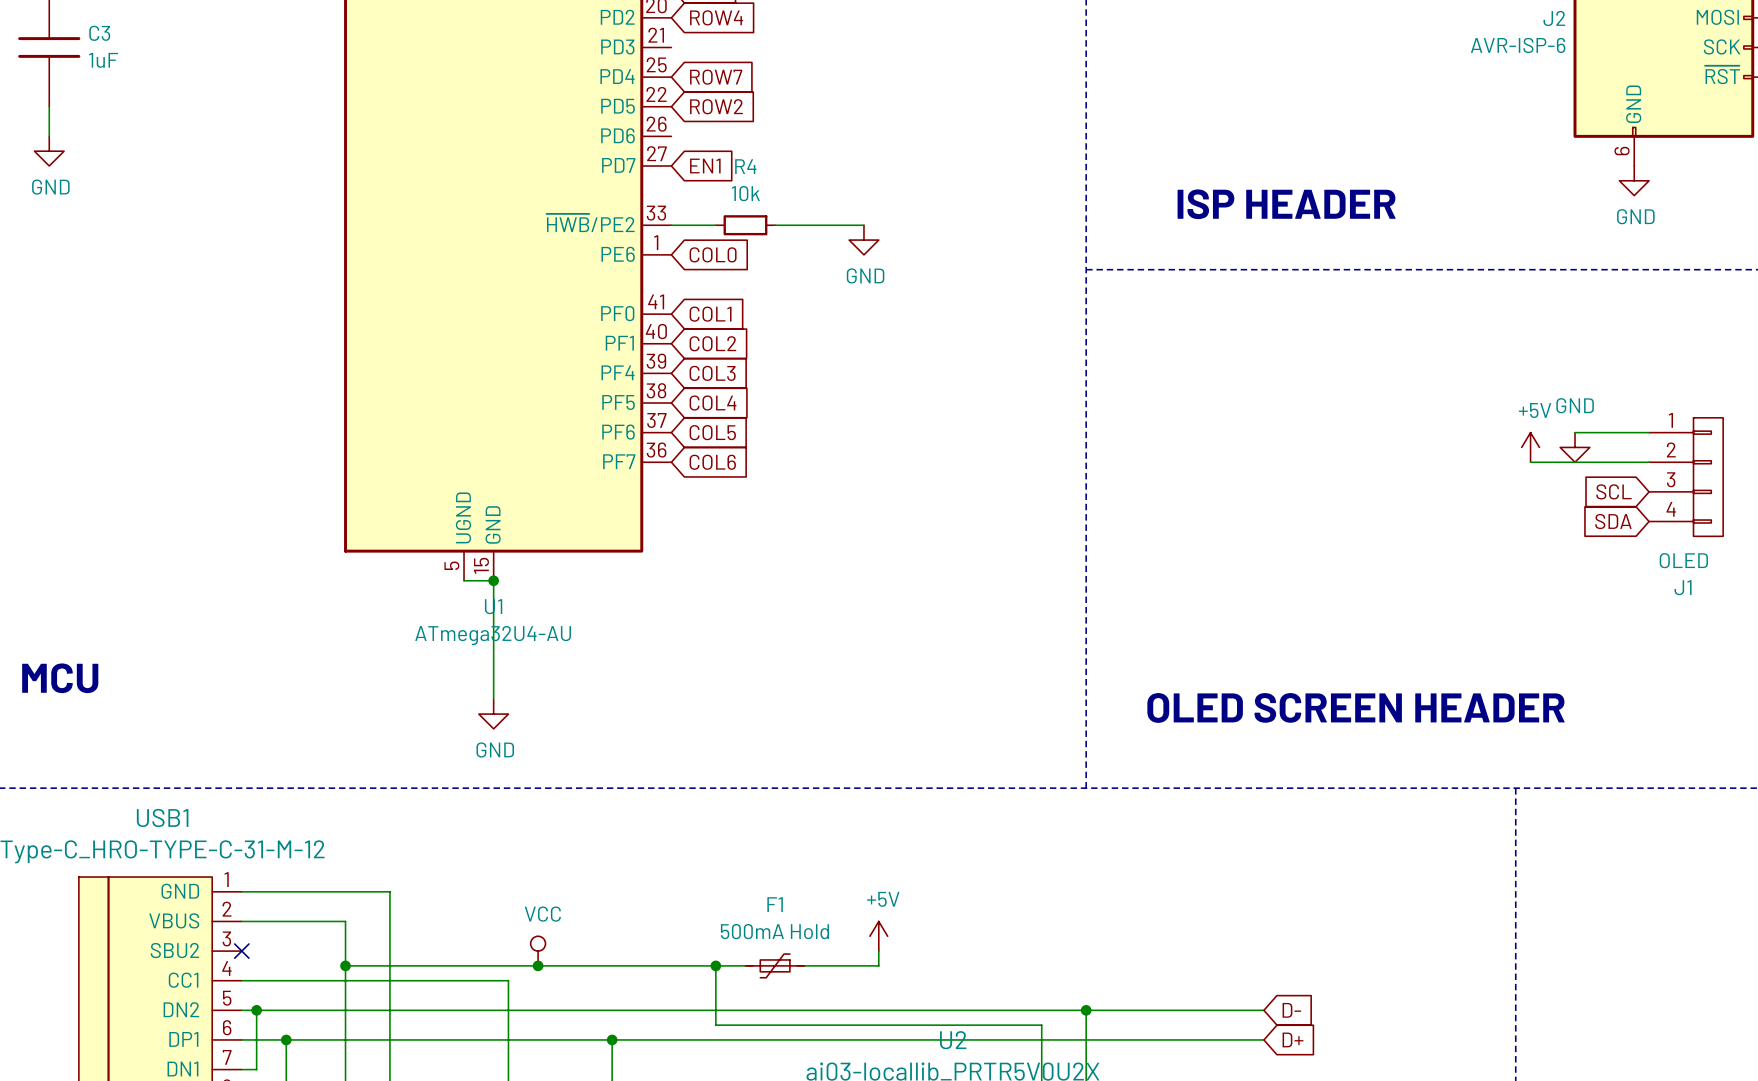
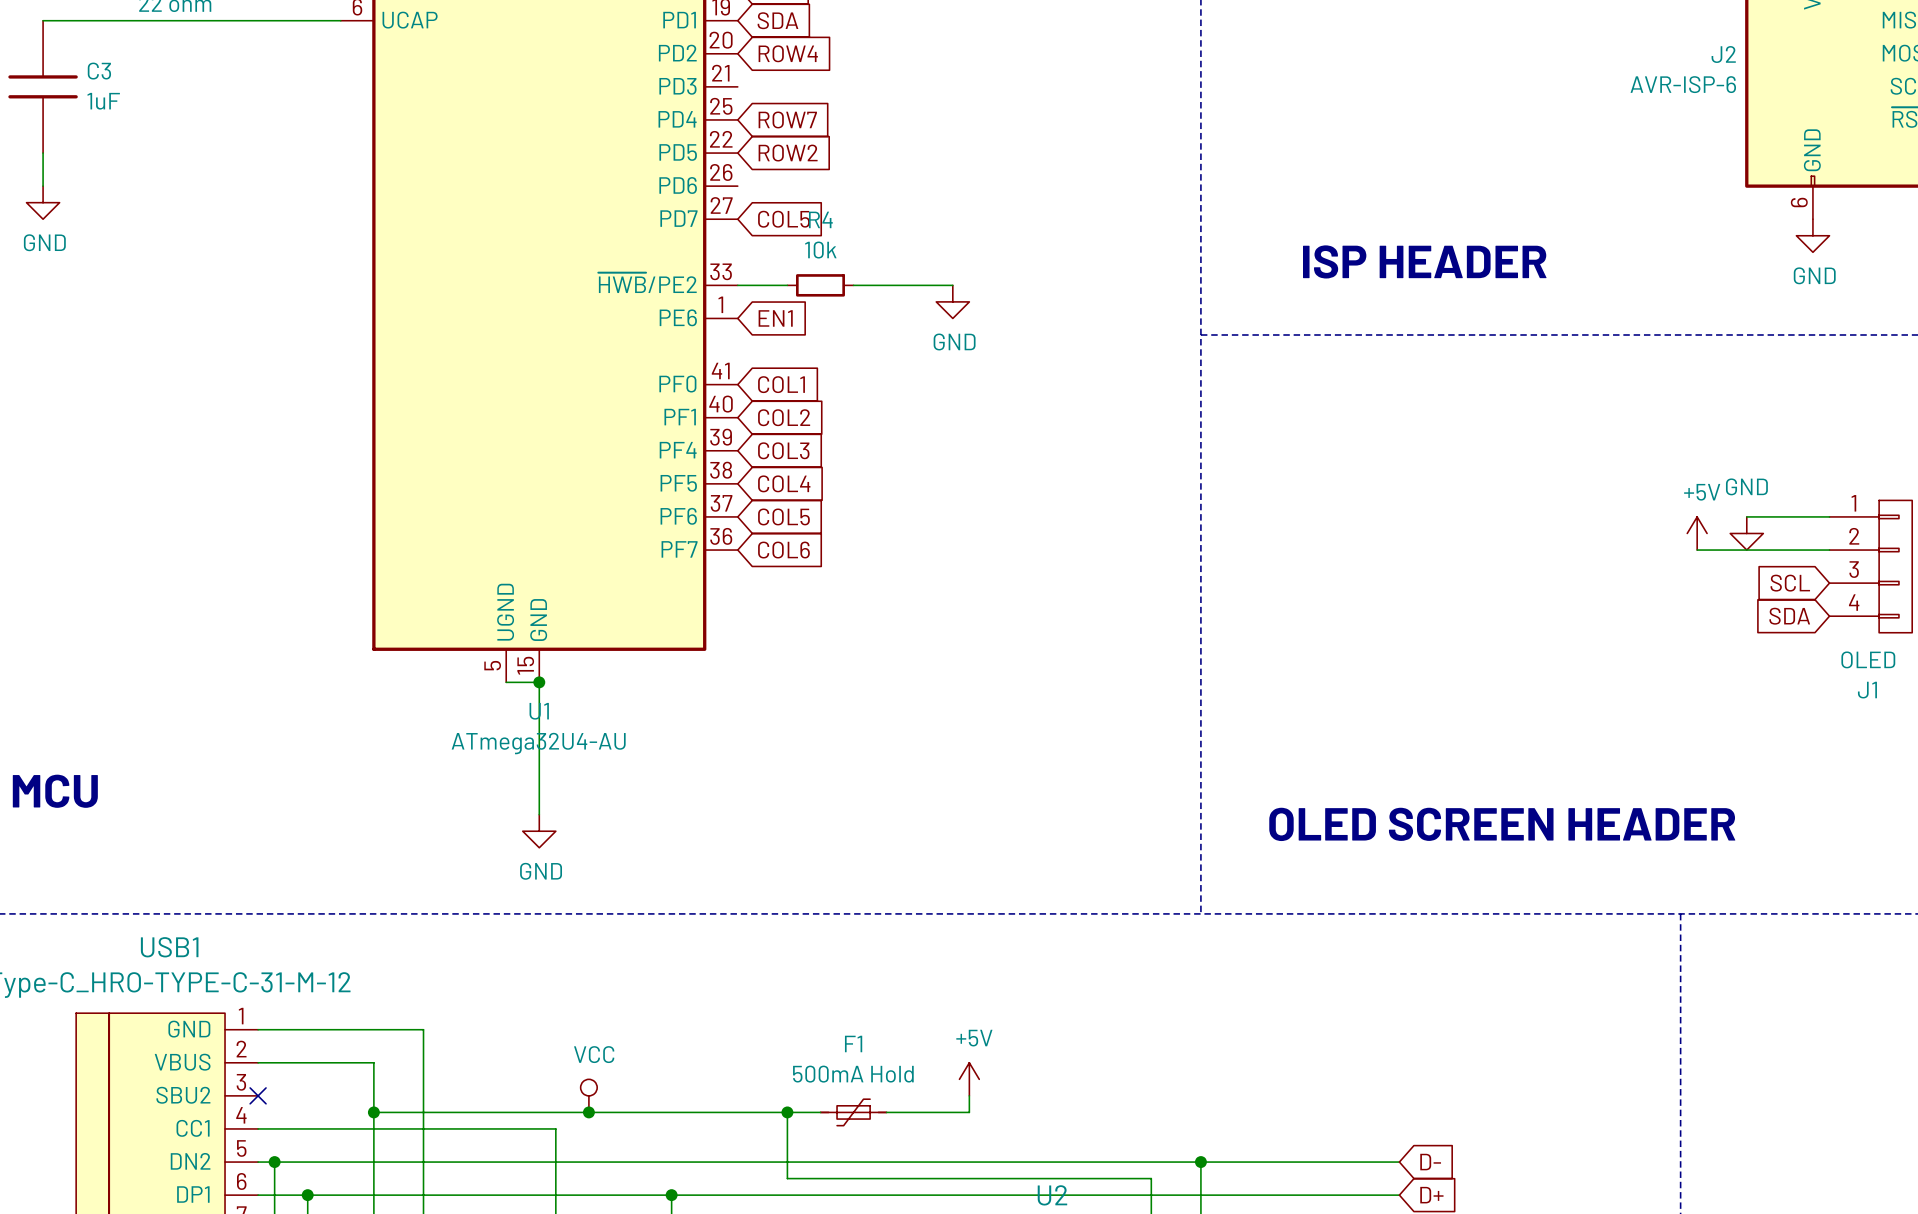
global label: EN1 (705, 166) -> COL5 (783, 219)
global label: COL0 (713, 254) -> EN1 (775, 318)

